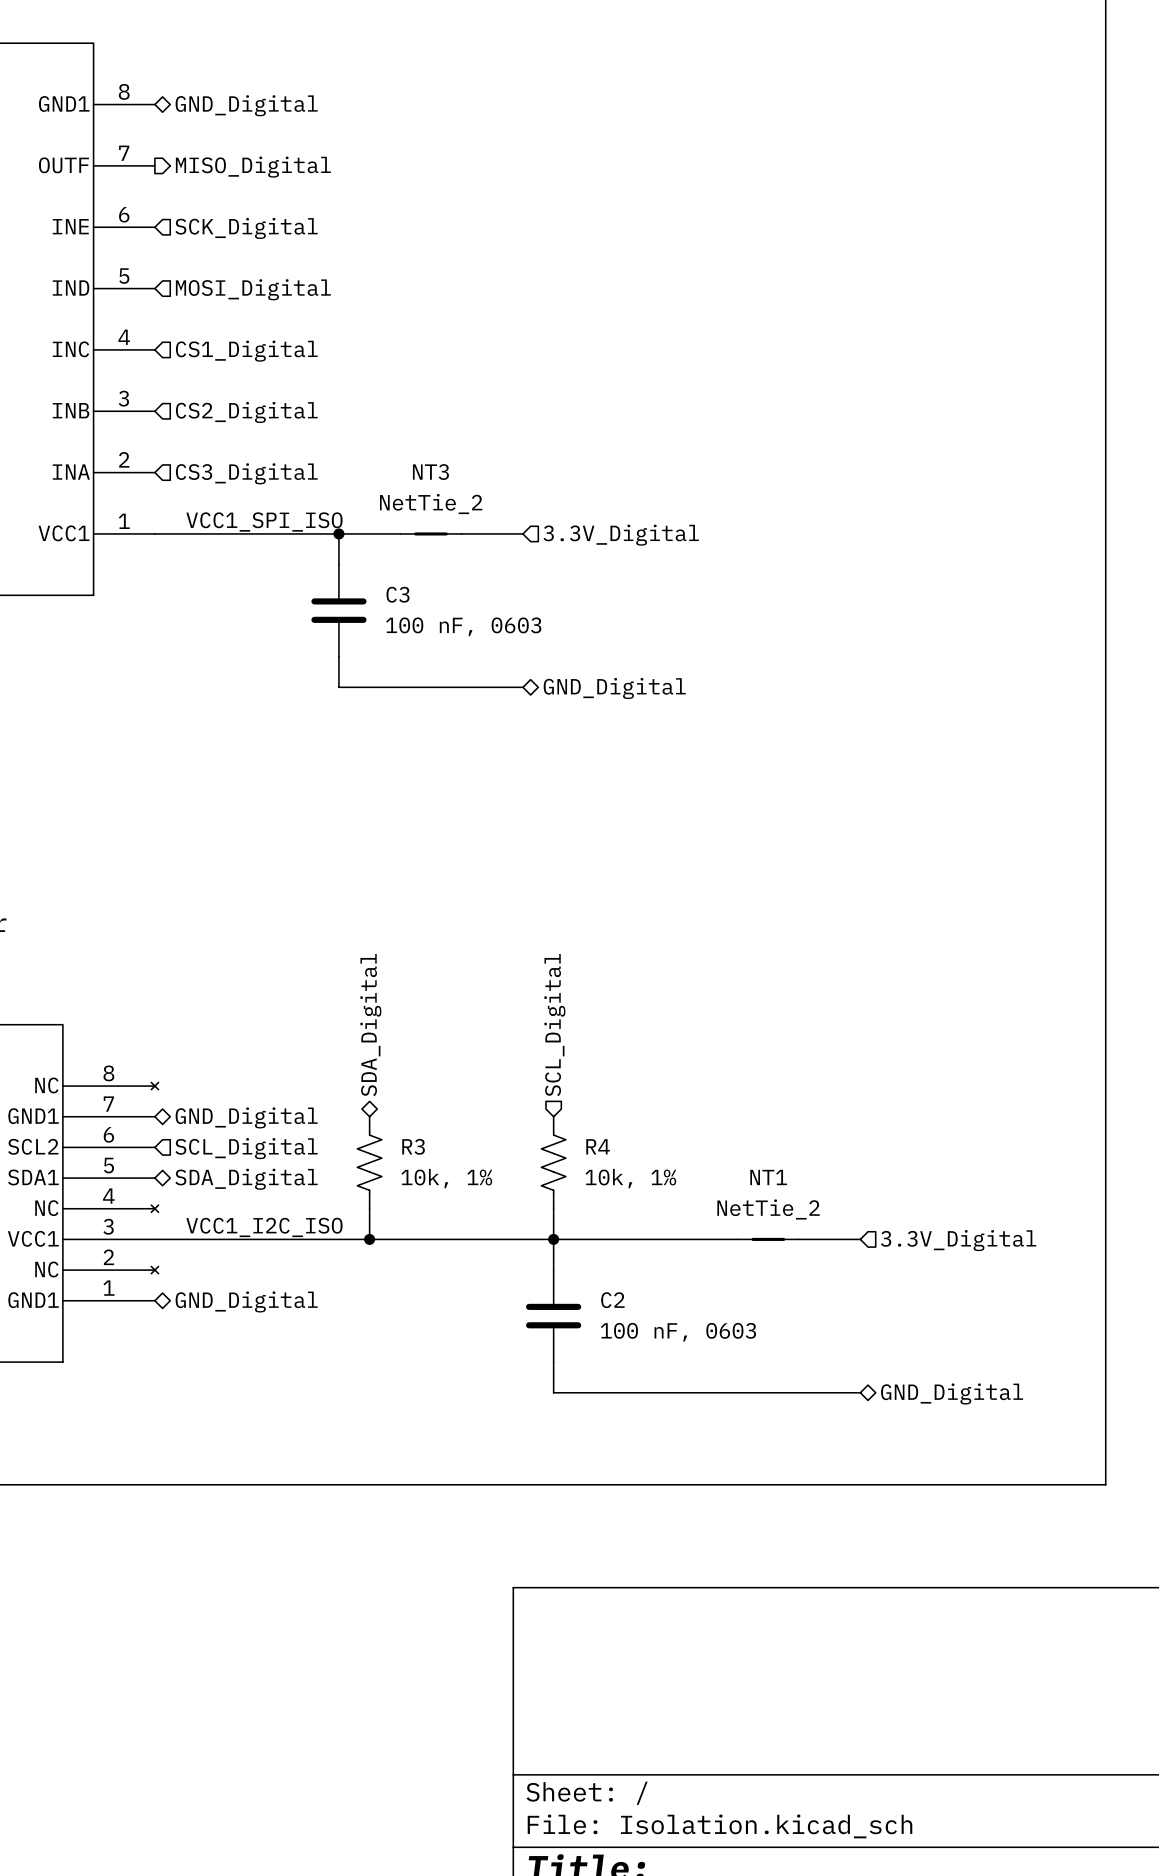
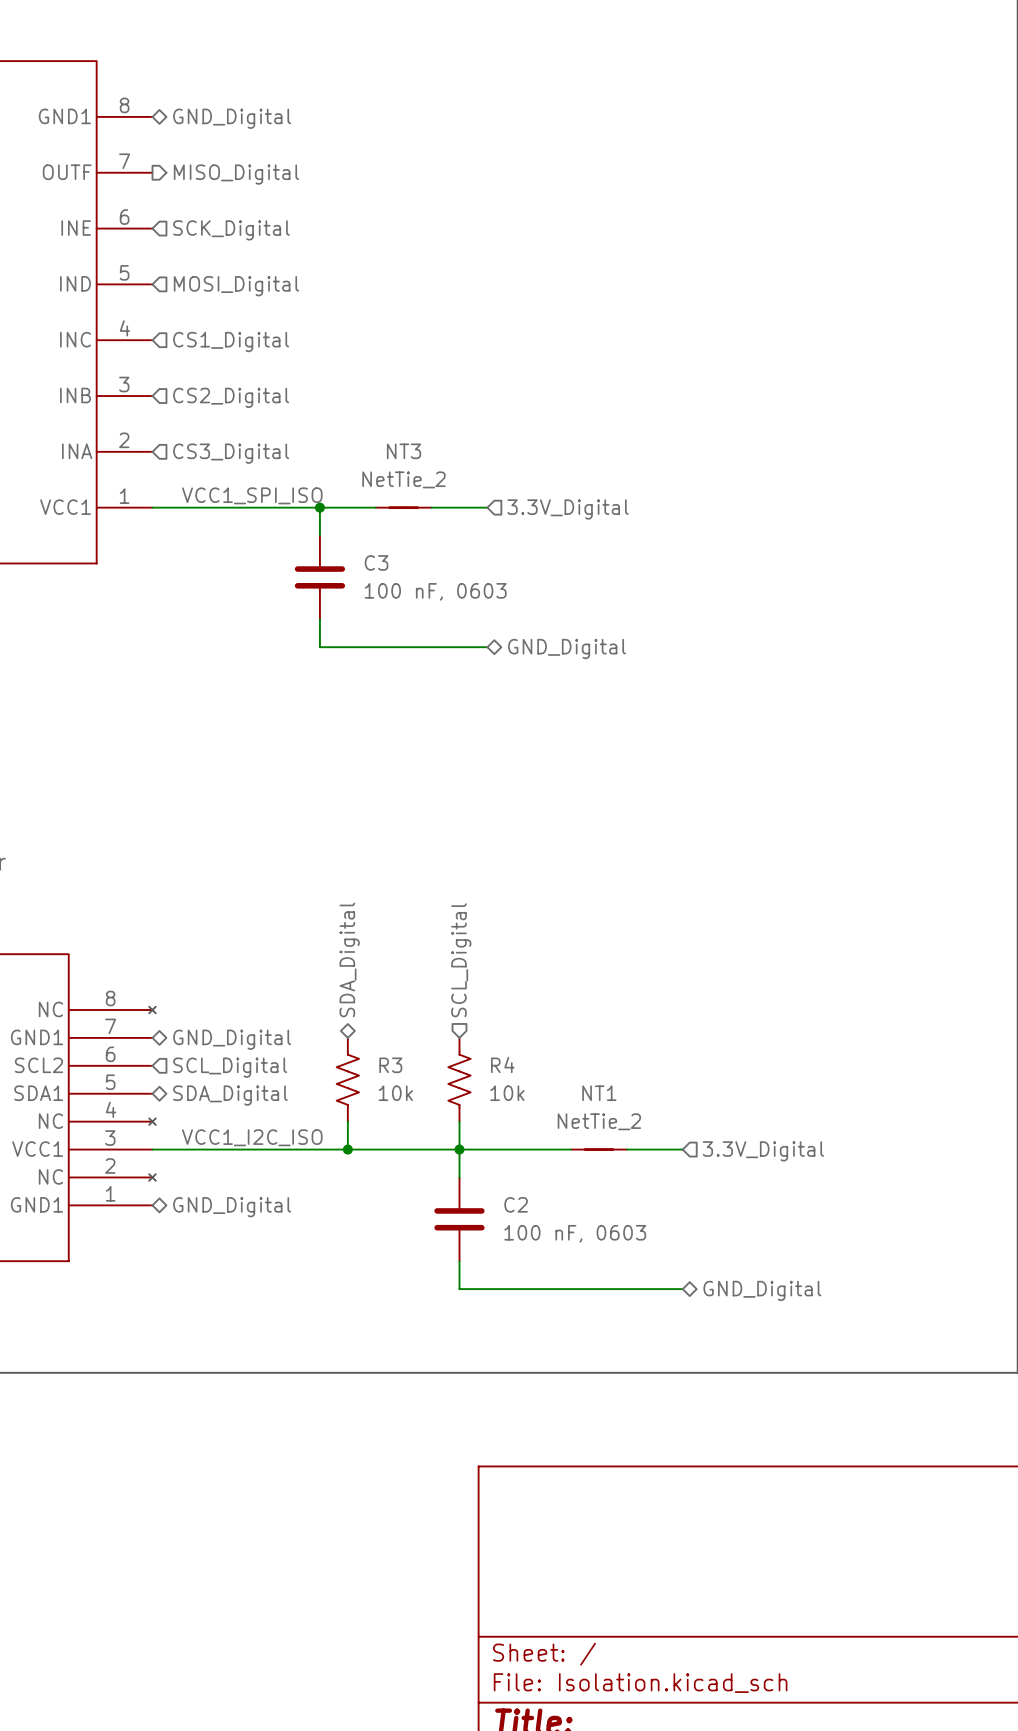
hierarchical label position: SCL_Digital (554, 1025) -> SCL_Digital (461, 960)
R4 position: (553, 1162) -> (459, 1079)
R3 value: 10k, 1% (446, 1178) -> 10k (395, 1093)
R4 value: 10k, 1% (630, 1178) -> 10k (507, 1093)
wire: (553, 1208) (553, 1270) -> (459, 1121) (459, 1177)
junction position: (553, 1239) -> (459, 1149)
NT1 position: (768, 1239) -> (599, 1149)
wire: (799, 1239) (860, 1239) -> none
hierarchical label position: 3.3V_Digital (958, 1240) -> 3.3V_Digital (763, 1151)
C2 position: (553, 1316) -> (459, 1219)
wire: (553, 1362) (553, 1392) -> (459, 1261) (459, 1289) (515, 1289)
wire: (737, 1392) (860, 1392) -> none
hierarchical label position: GND_Digital (952, 1393) -> GND_Digital (762, 1290)

